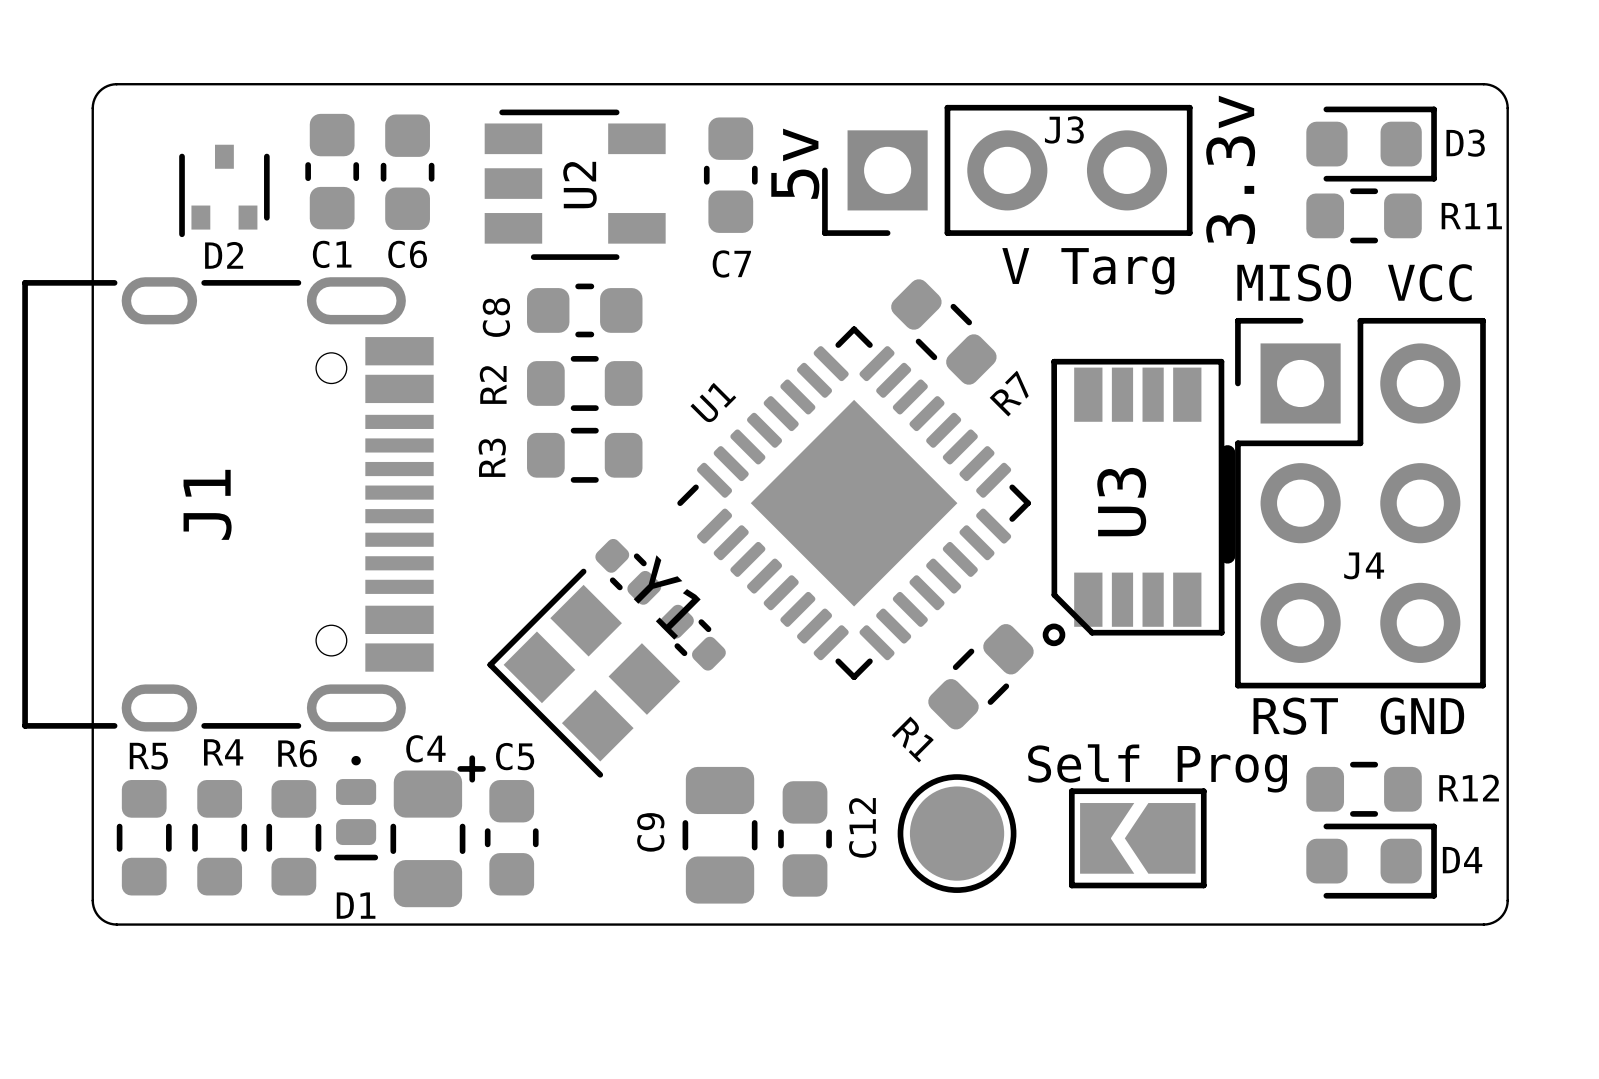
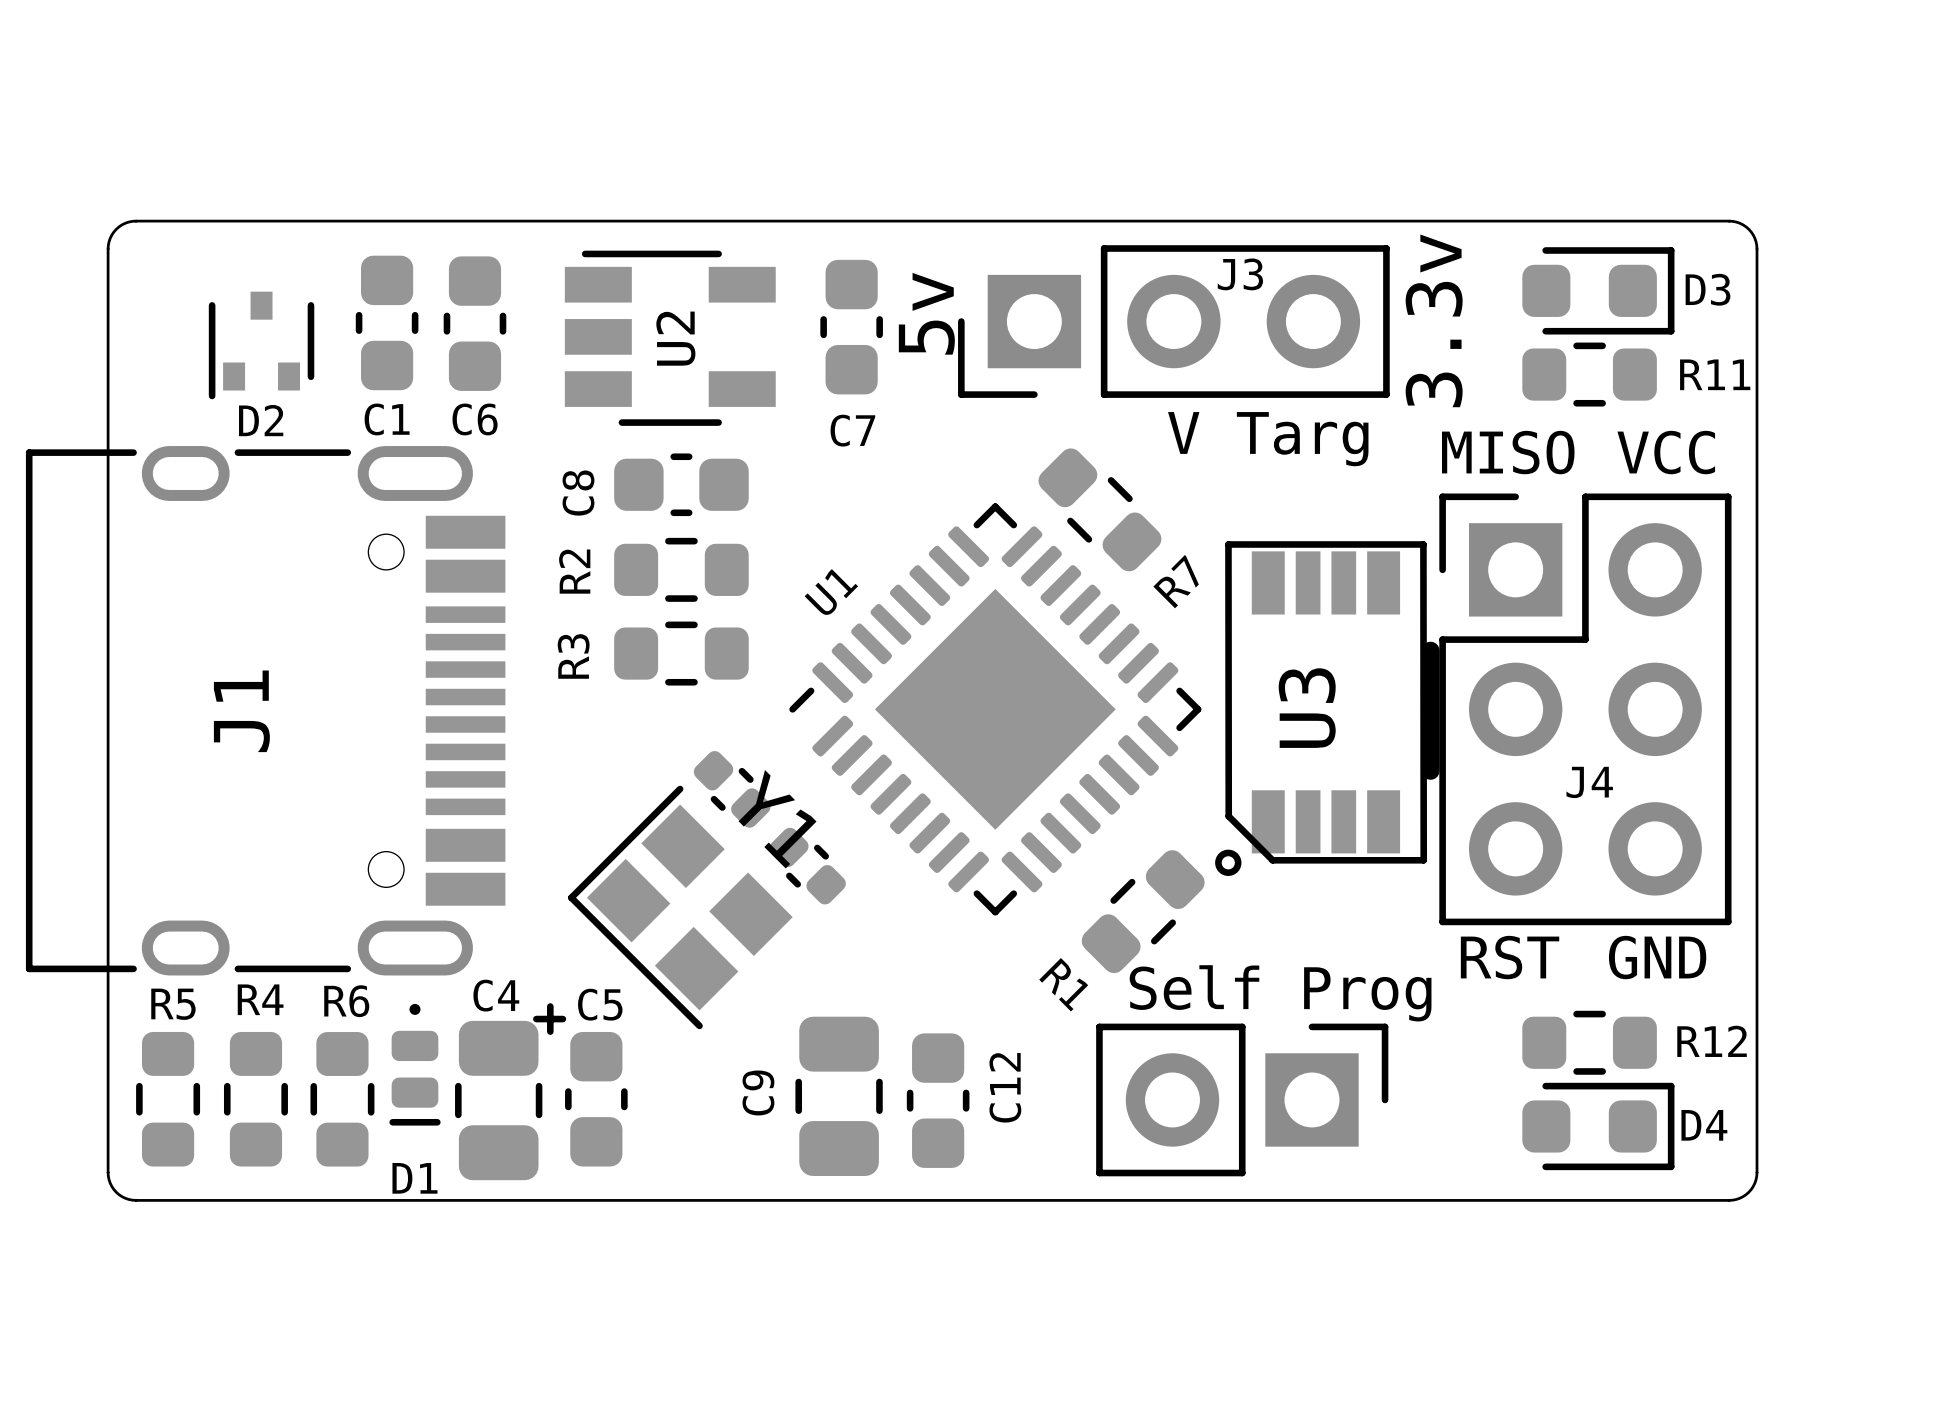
text position: Self Prog (1157, 768) -> Self Prog (1280, 993)
part: (957, 833) -> none
part: none -> (1242, 1099)
part: (1137, 838) -> none

